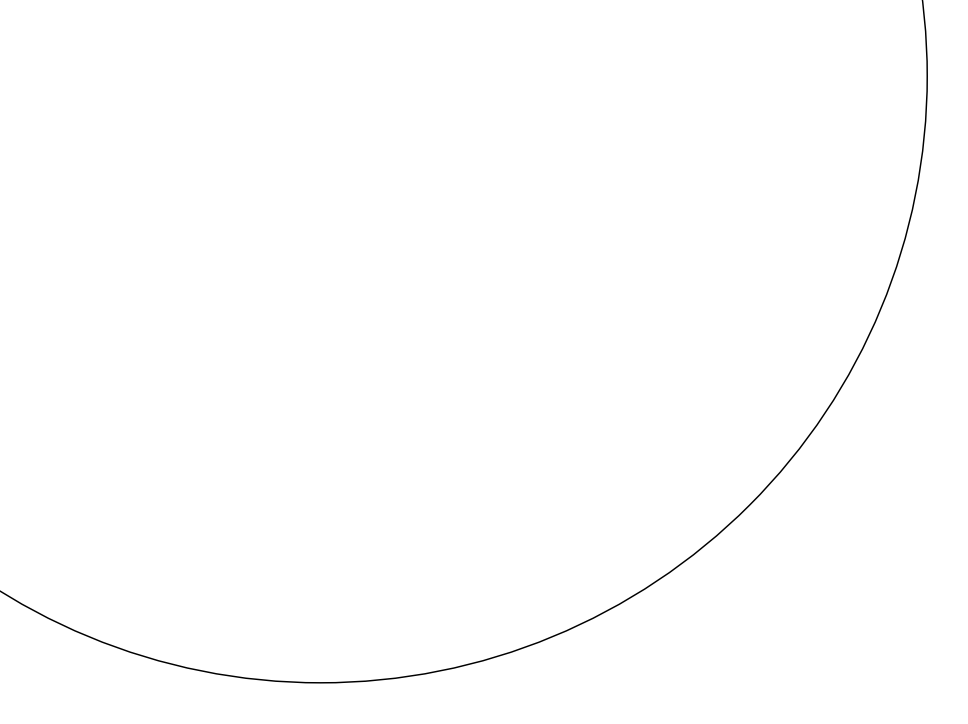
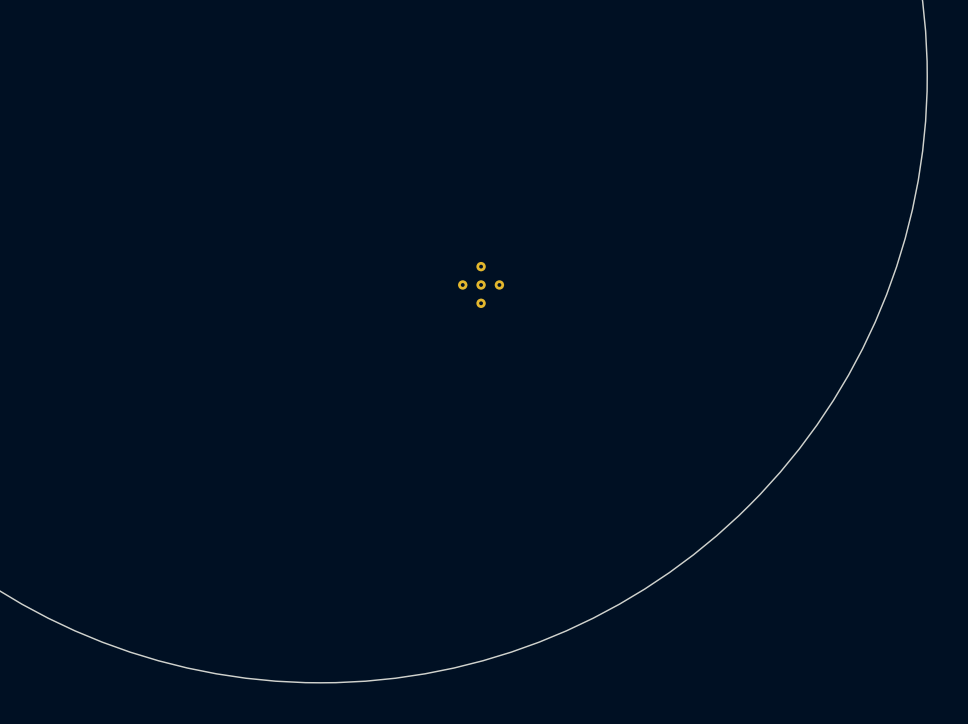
part: none -> (481, 284)

